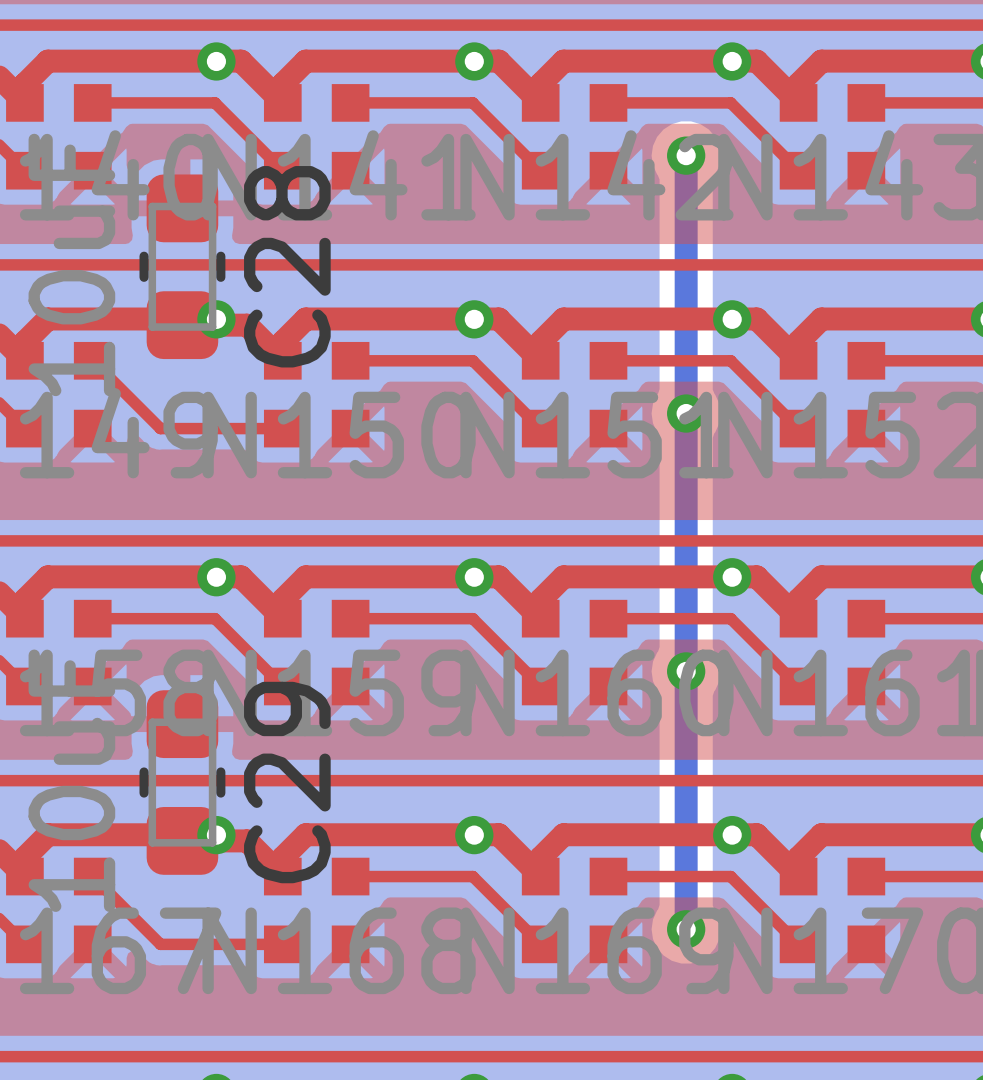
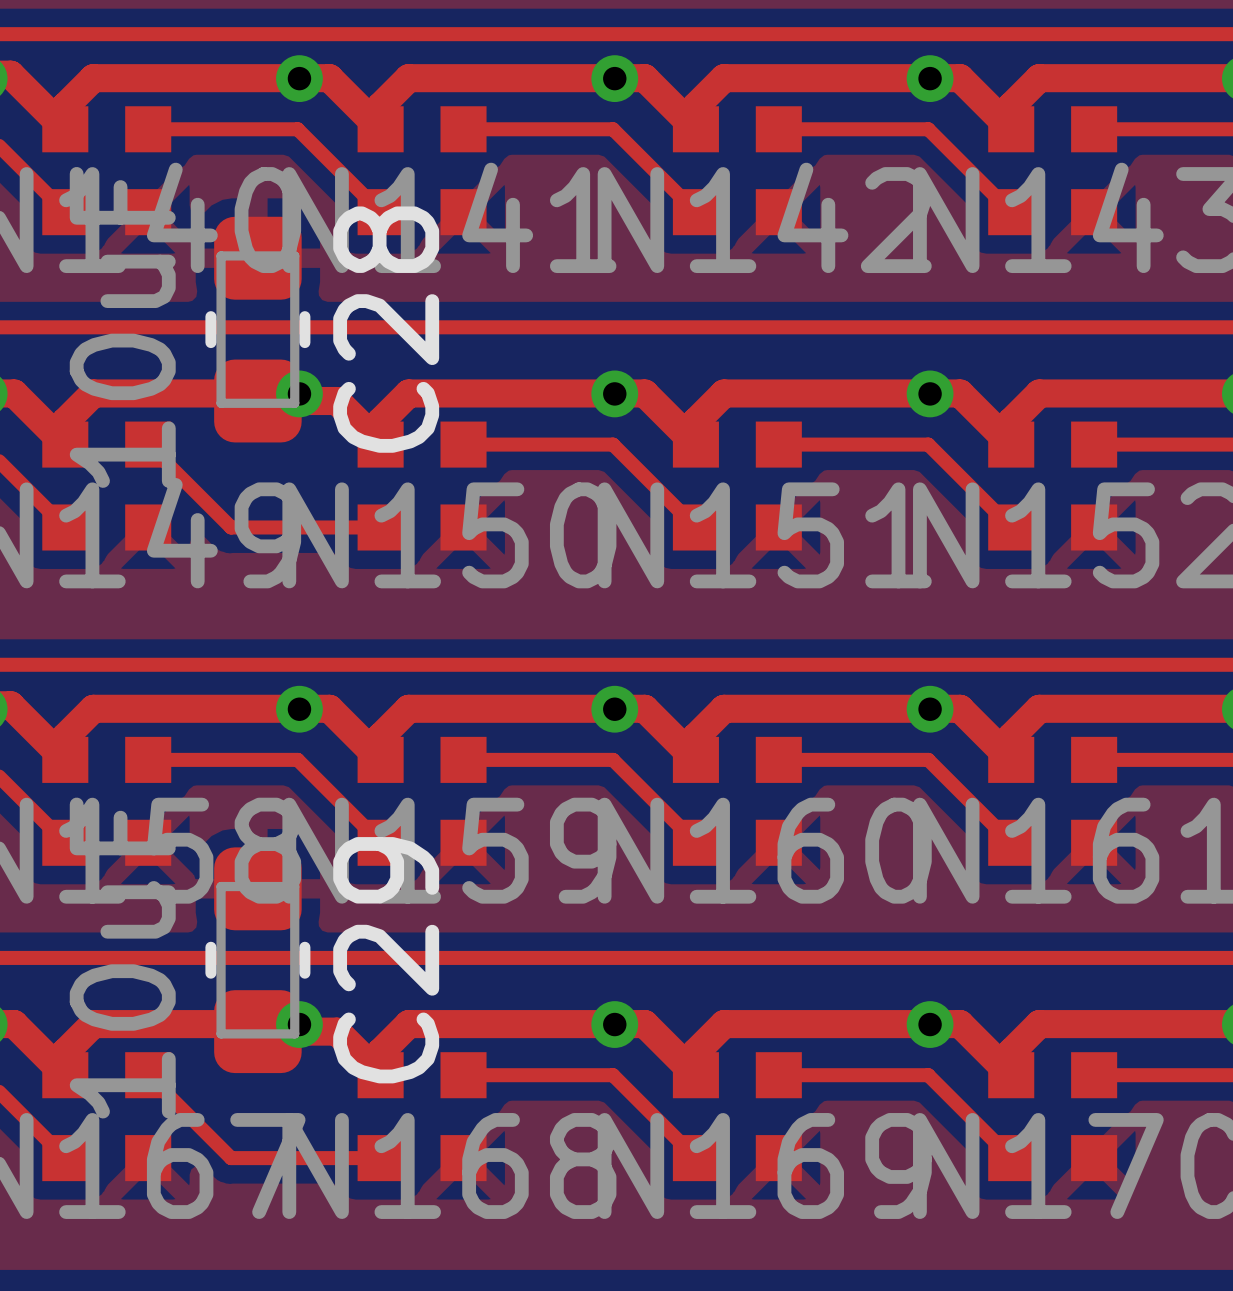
bottom track: (686, 155) (686, 929) -> none
via: (686, 155) -> none
via: (686, 413) -> none
via: (686, 671) -> none
via: (686, 929) -> none

